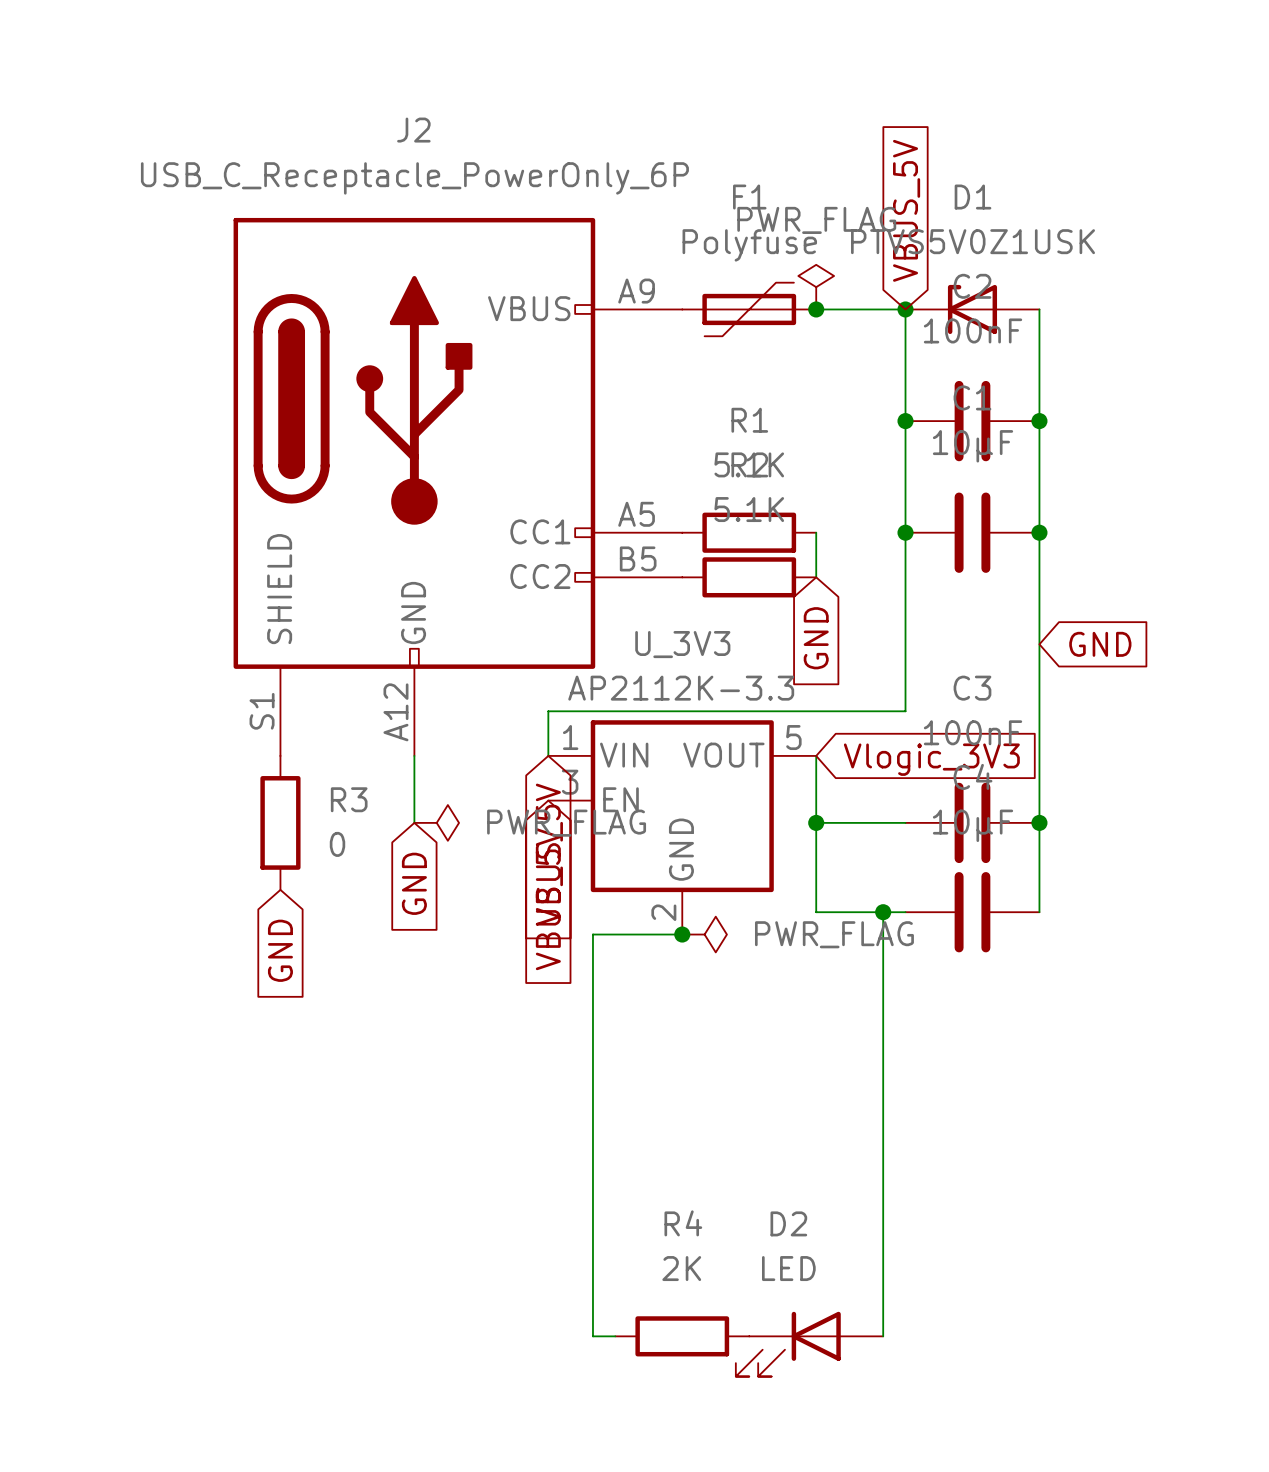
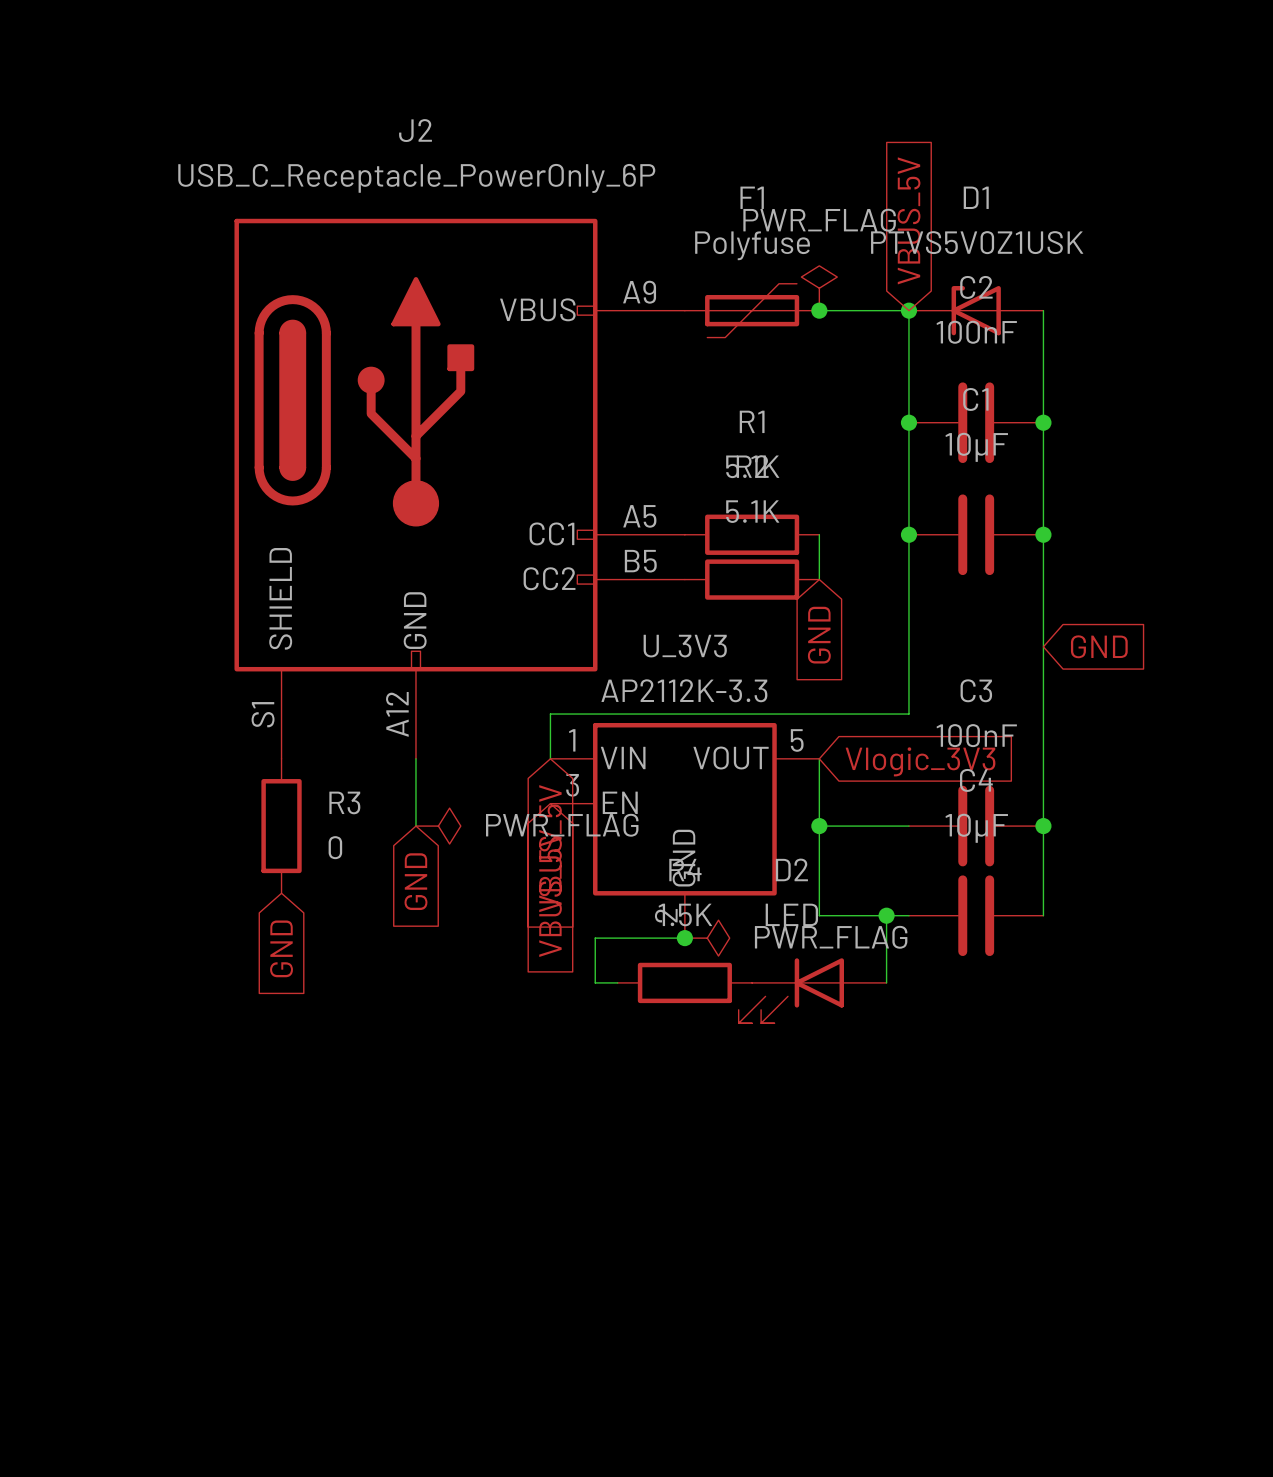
wire: (592, 979) (592, 1336) (615, 1336) -> (595, 982) (617, 982)
wire: (883, 979) (883, 1336) -> none
R4 value: 2K (681, 1268) -> 1.5K (685, 914)
R4 position: (682, 1336) -> (684, 982)
D2 position: (809, 1344) -> (812, 990)

